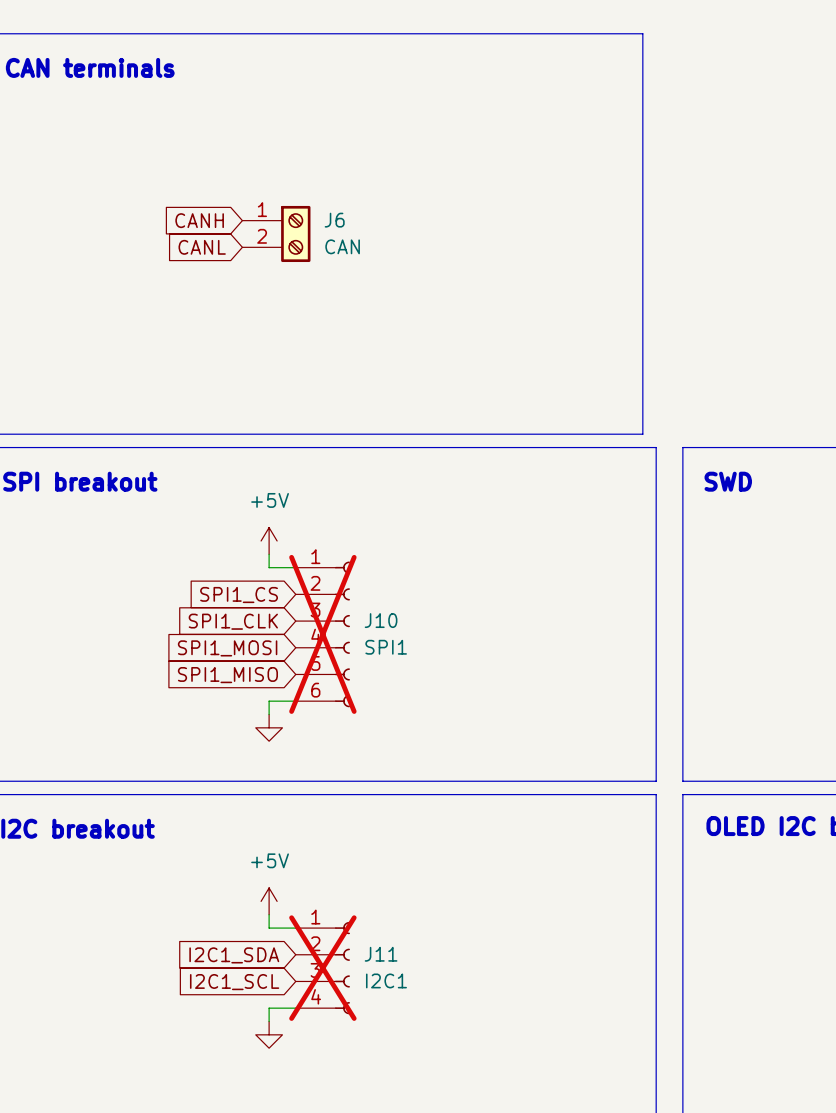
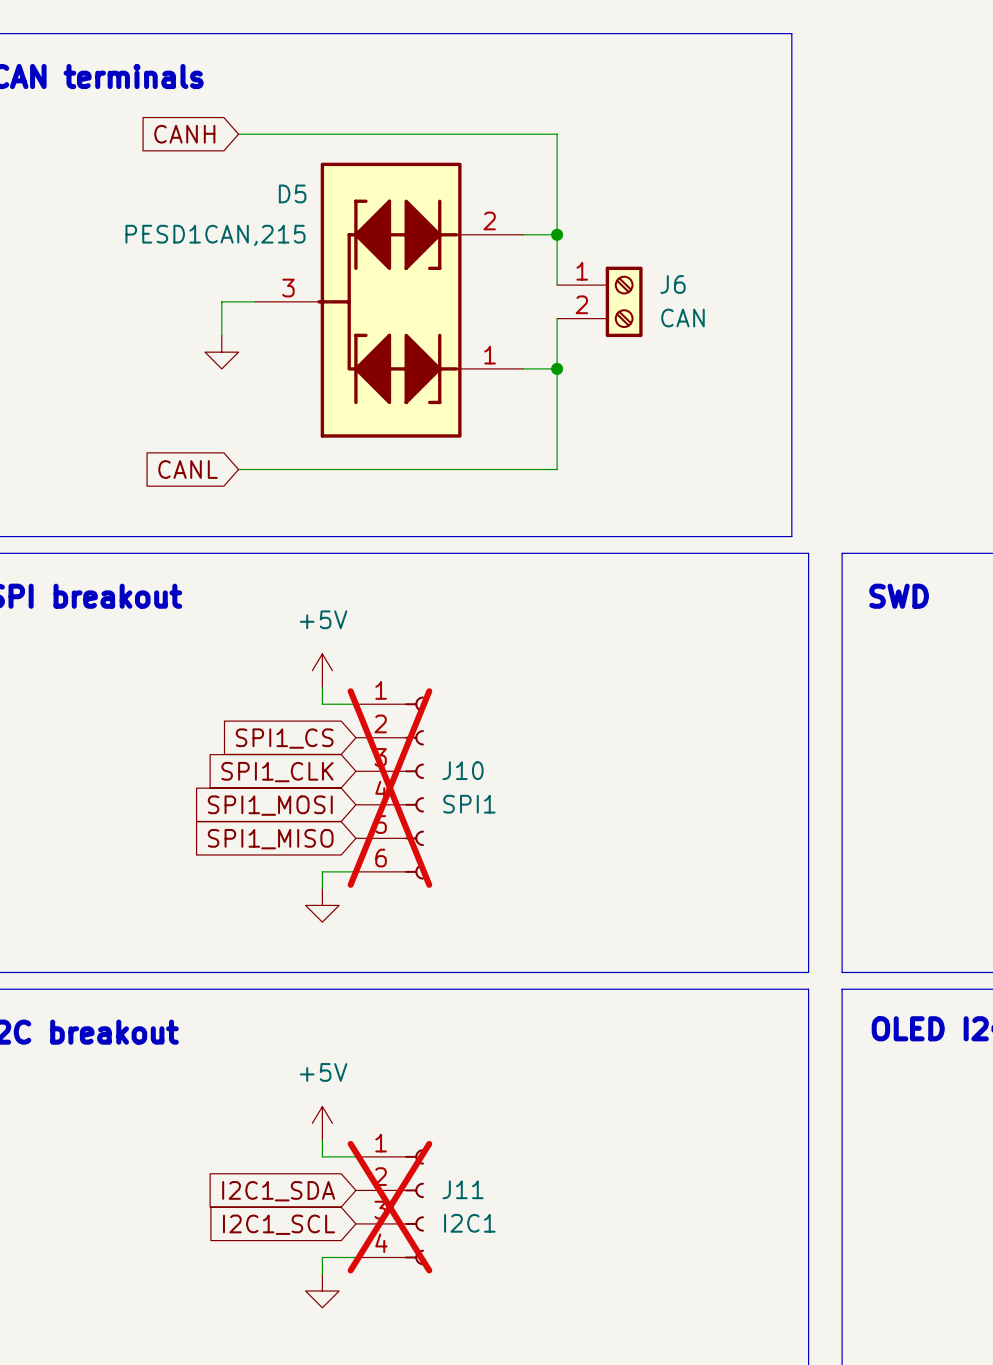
wire: none -> (238, 134) (557, 134) (557, 285)
wire: none -> (523, 234) (557, 234)
junction: none -> (557, 234)
global label position: CANH (199, 220) -> CANH (184, 134)
J6 position: (276, 233) -> (599, 301)
D5: none -> PESD1CAN,215 (389, 300)
global label position: CANL (202, 247) -> CANL (188, 469)
wire: none -> (255, 301) (221, 301) (221, 335)
wire: none -> (557, 318) (557, 469) (238, 469)
power symbol: none -> (221, 352)
wire: none -> (523, 368) (557, 368)
junction: none -> (557, 368)

